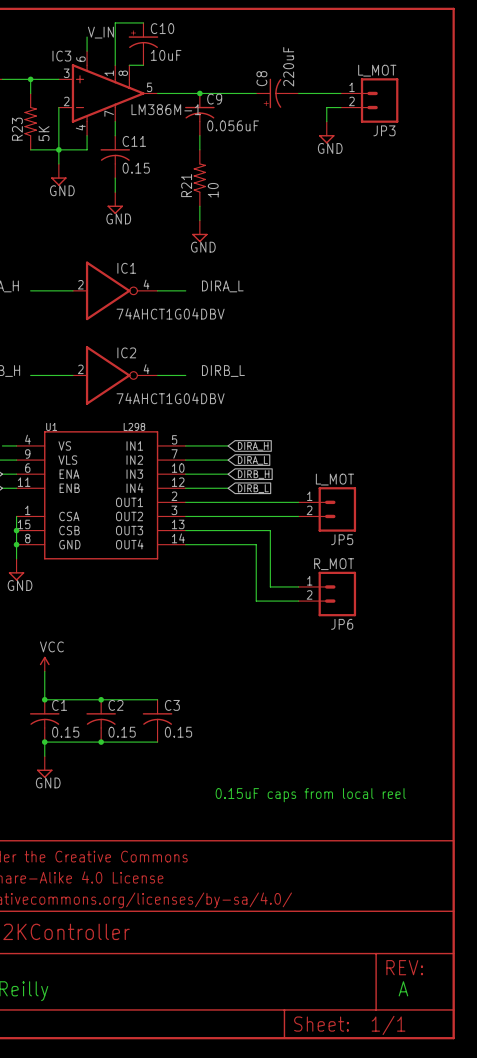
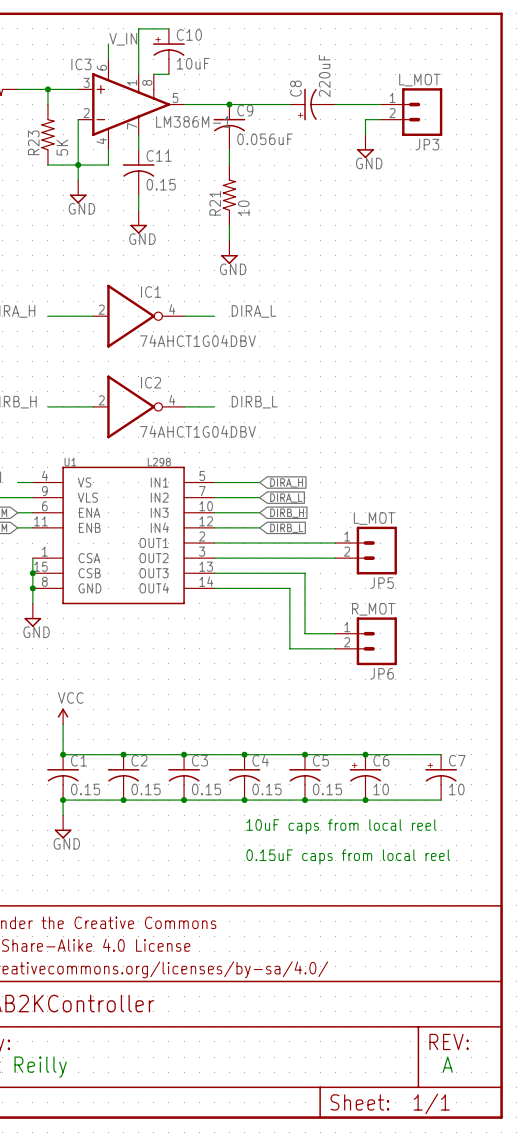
wire: none -> (184, 754) (441, 754)
junction: none -> (184, 754)
junction: none -> (244, 754)
junction: none -> (305, 754)
junction: none -> (365, 754)
C4: none -> 0.15 (244, 777)
C5: none -> 0.15 (305, 777)
C6: none -> 10 (365, 777)
C7: none -> 10 (441, 777)
wire: none -> (184, 800) (441, 800)
junction: none -> (184, 800)
junction: none -> (244, 800)
junction: none -> (305, 800)
junction: none -> (365, 800)
text: none -> 10uF caps from local reel (341, 826)

